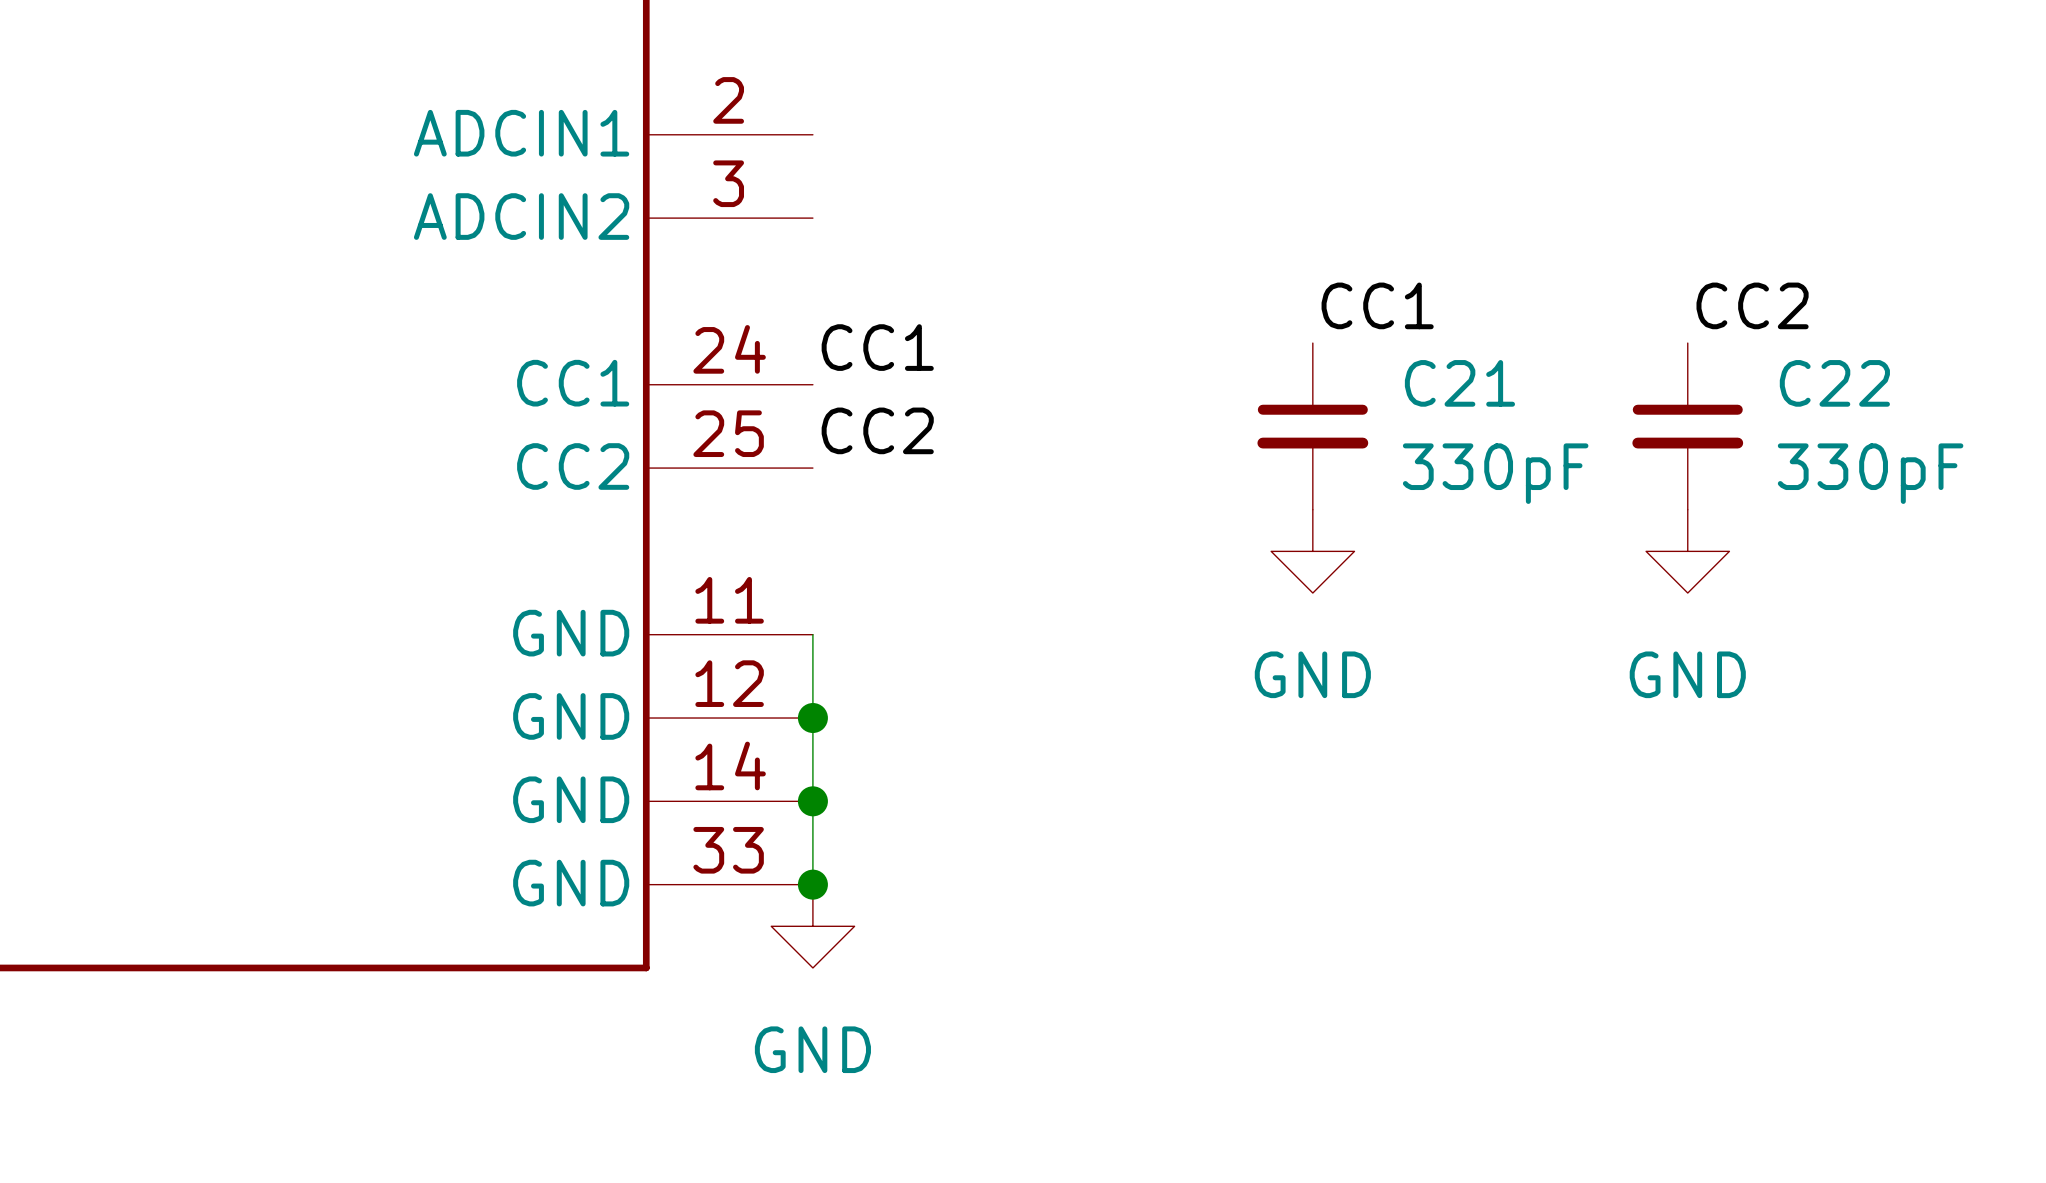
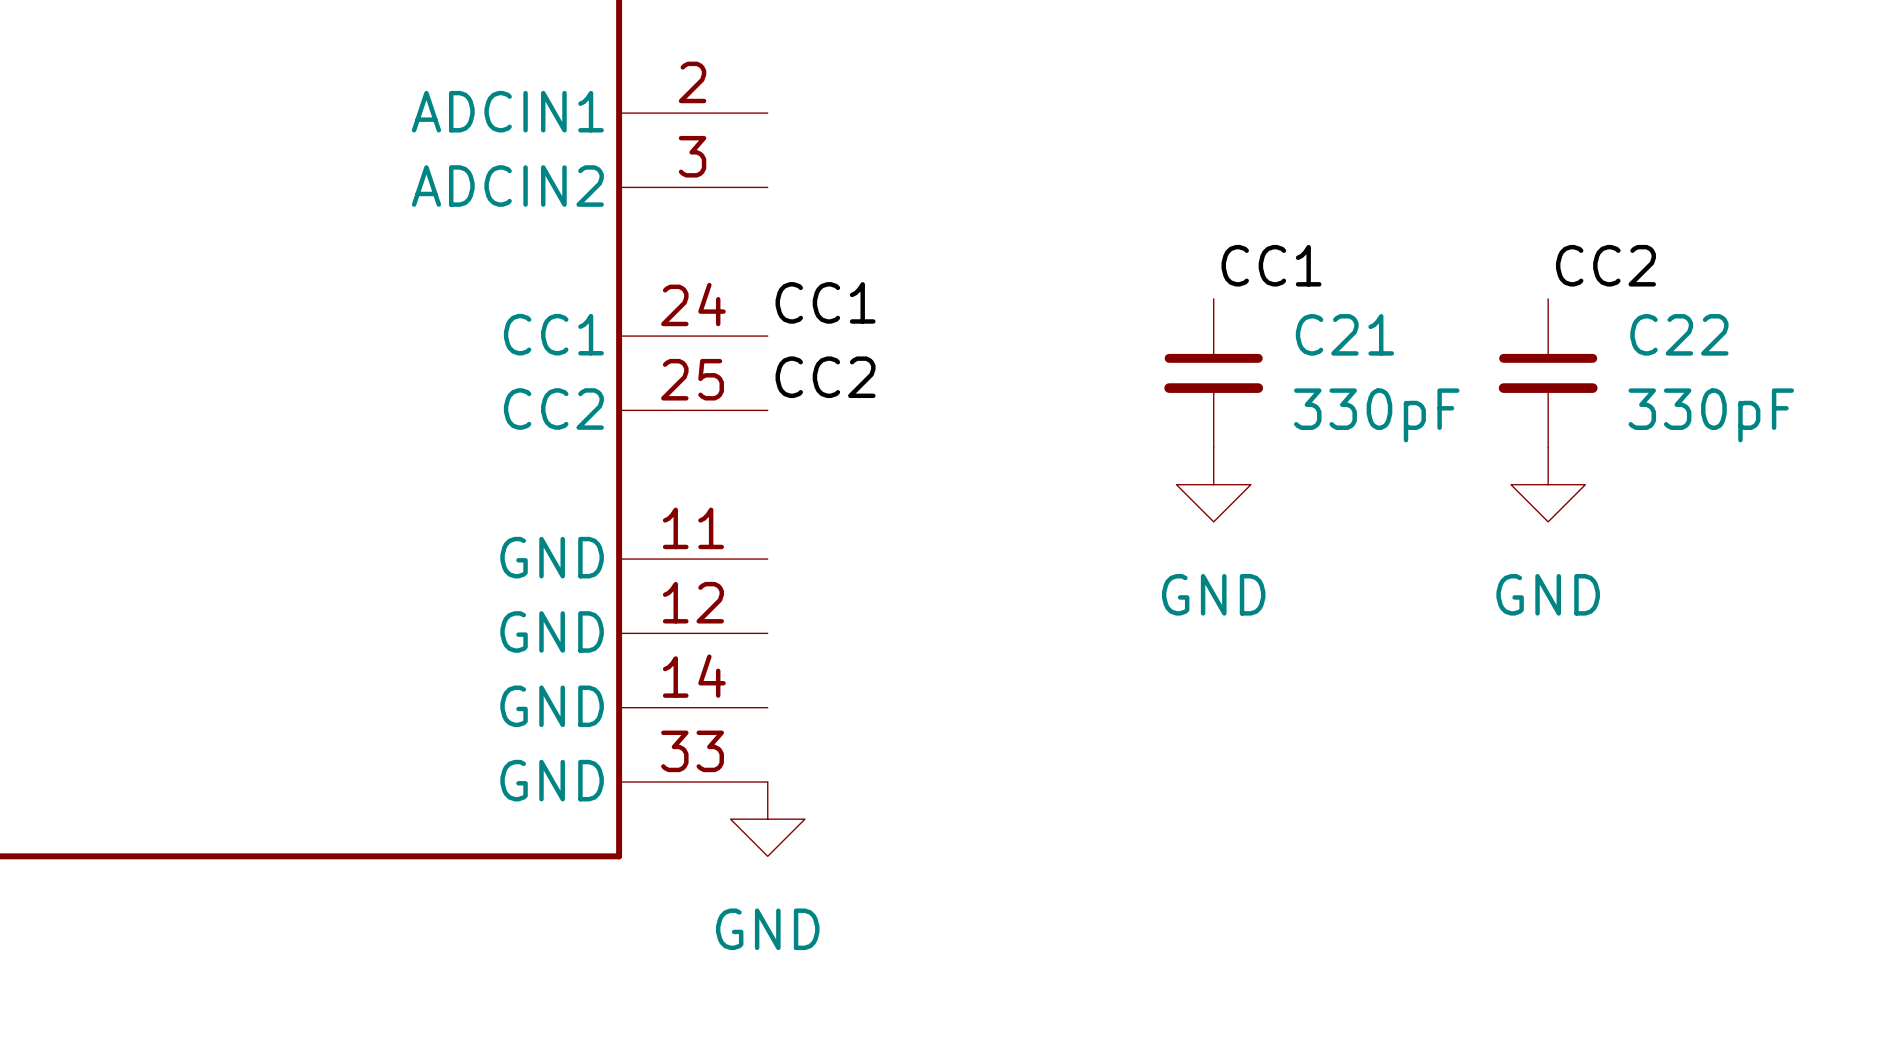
wire: (812, 634) (812, 884) -> none
junction: (812, 718) -> none
junction: (812, 801) -> none
junction: (812, 884) -> none

